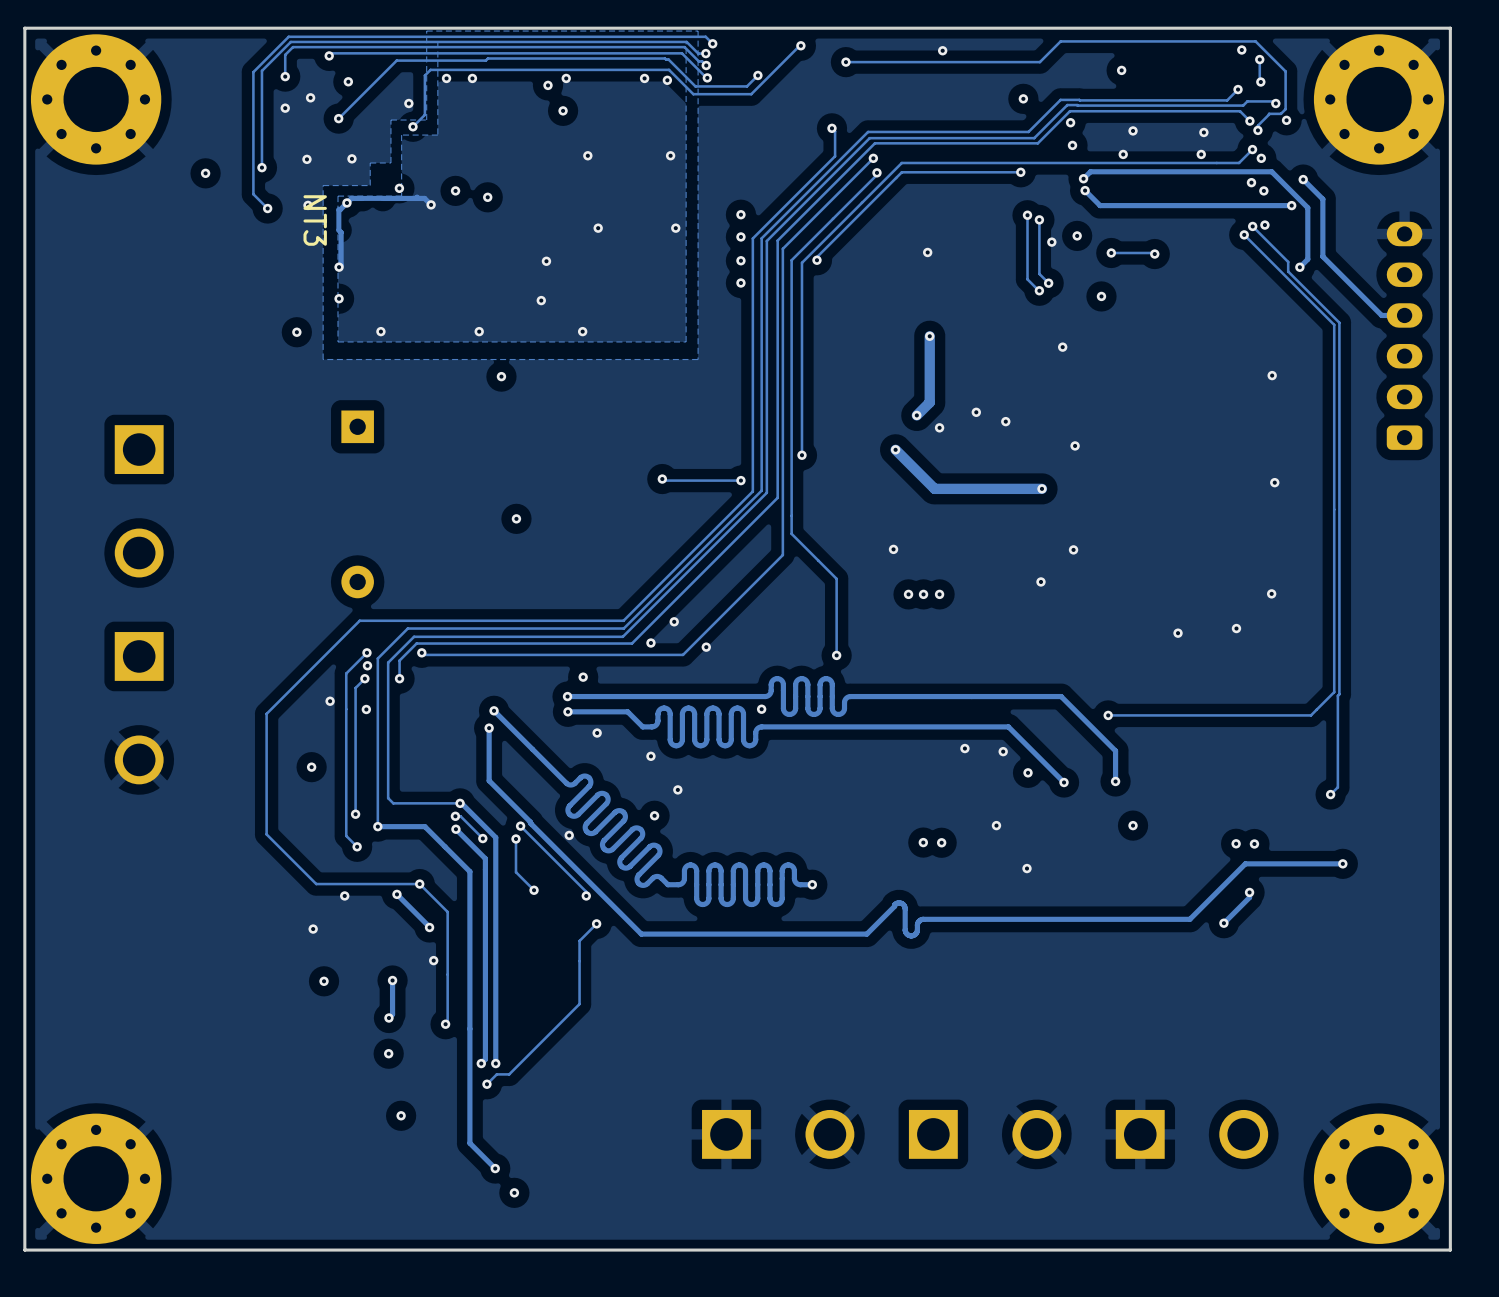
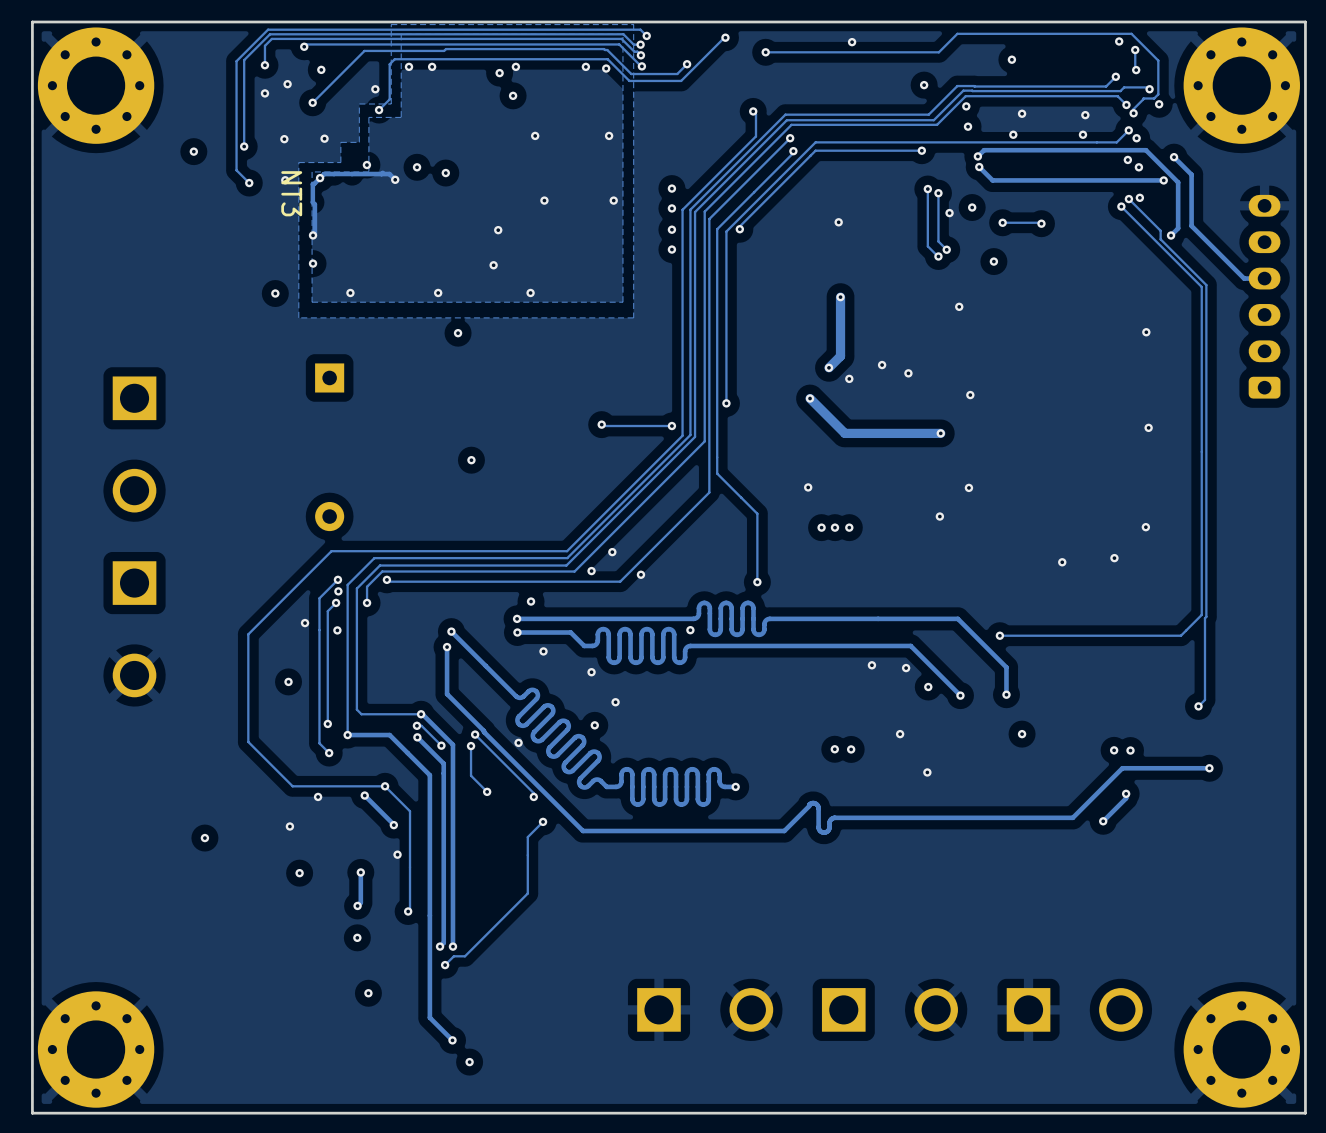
via: none -> (204, 838)

